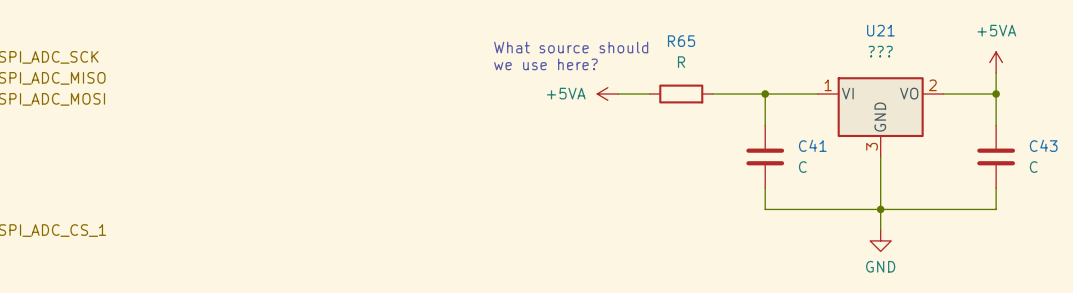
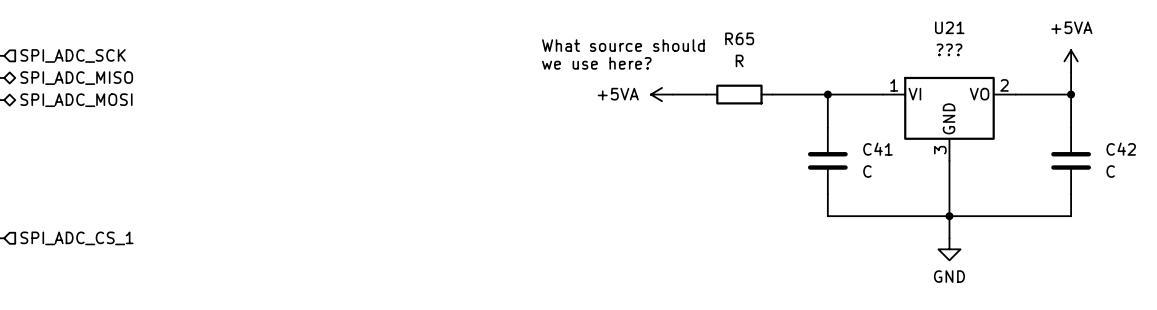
C43 name: C43 (1043, 145) -> C42 (1121, 149)

